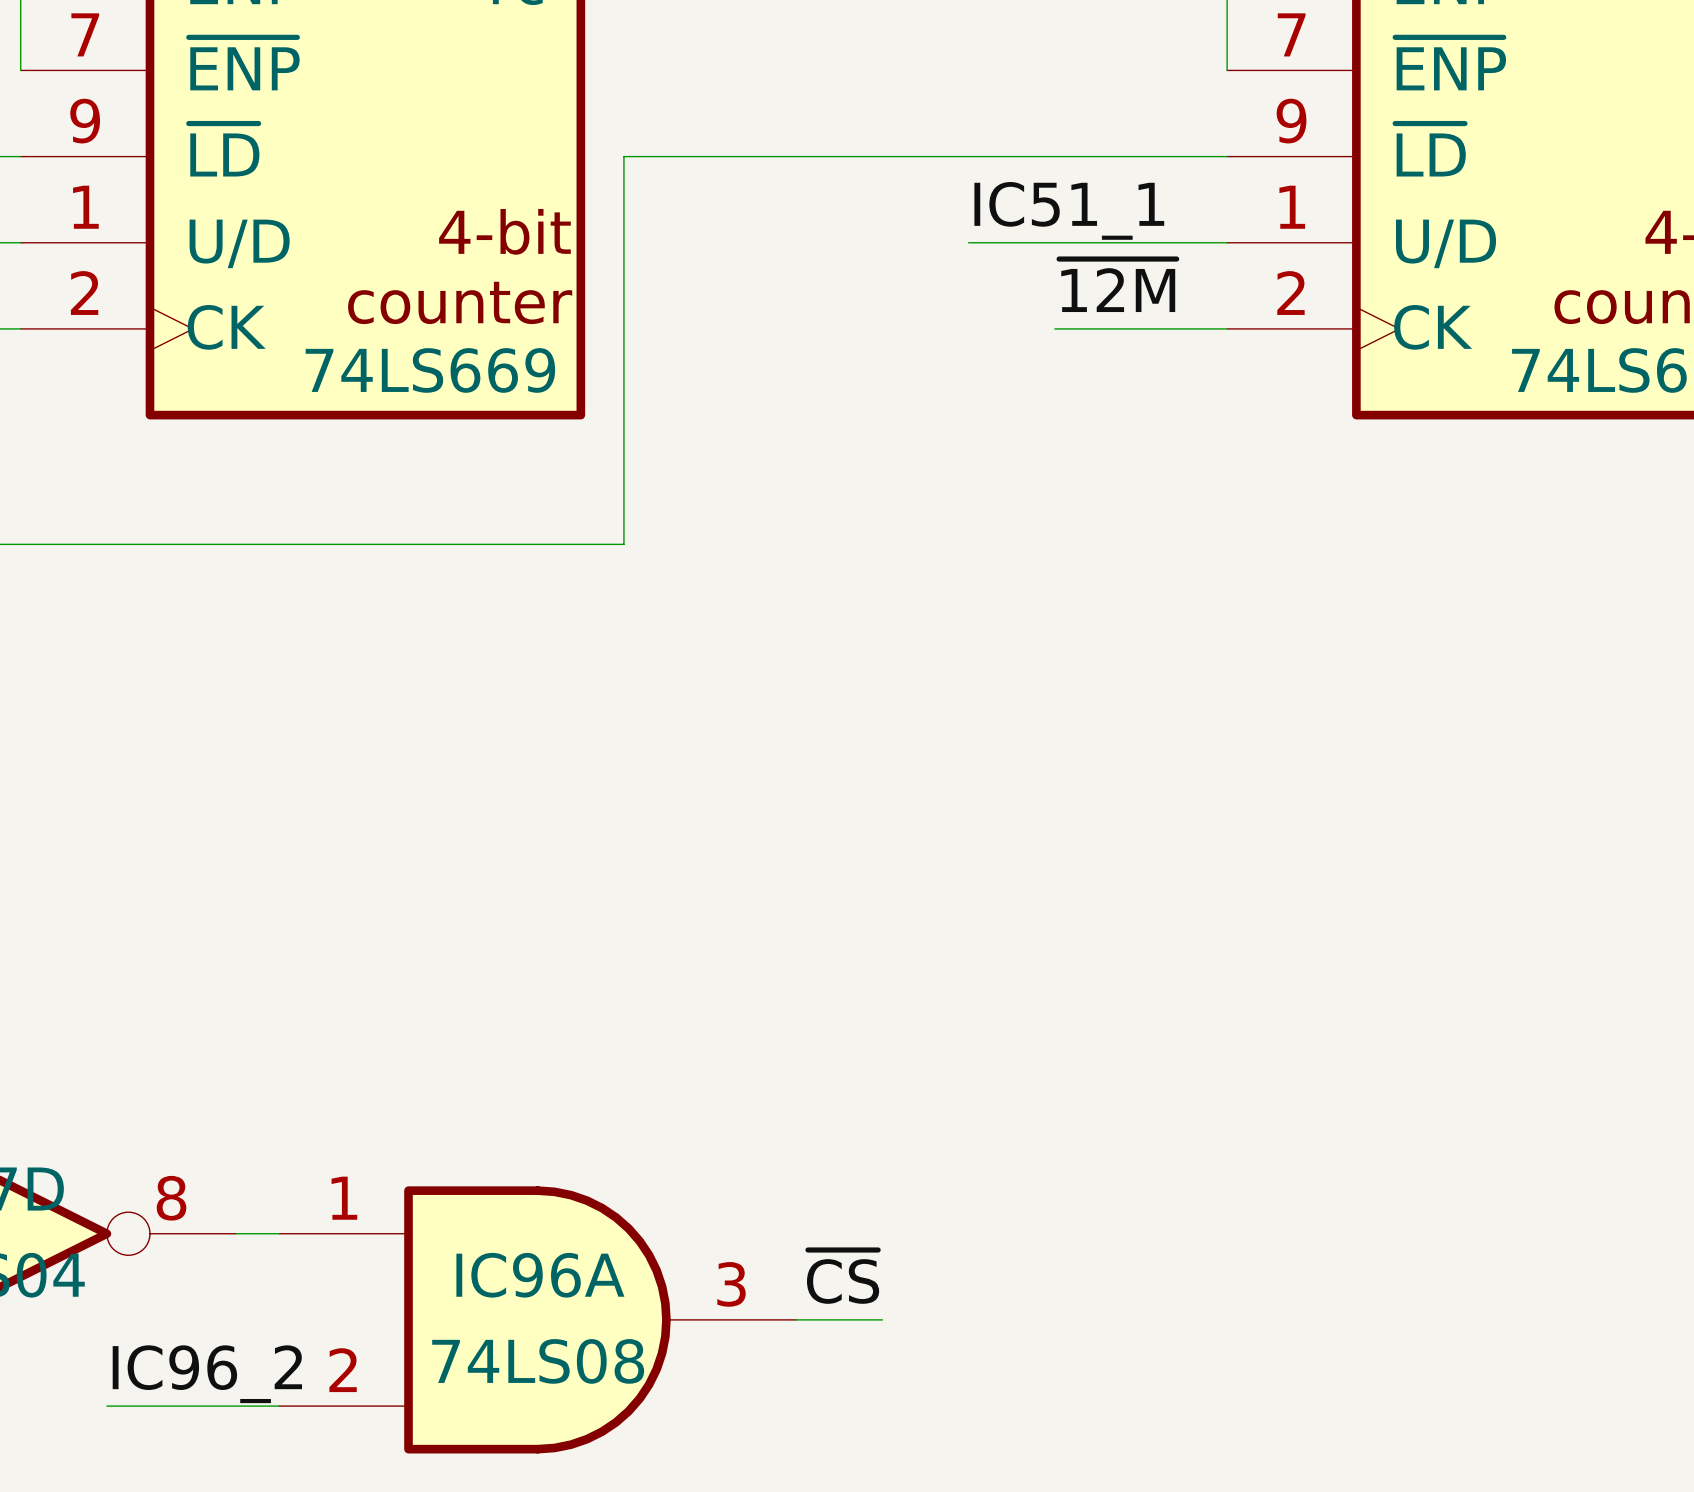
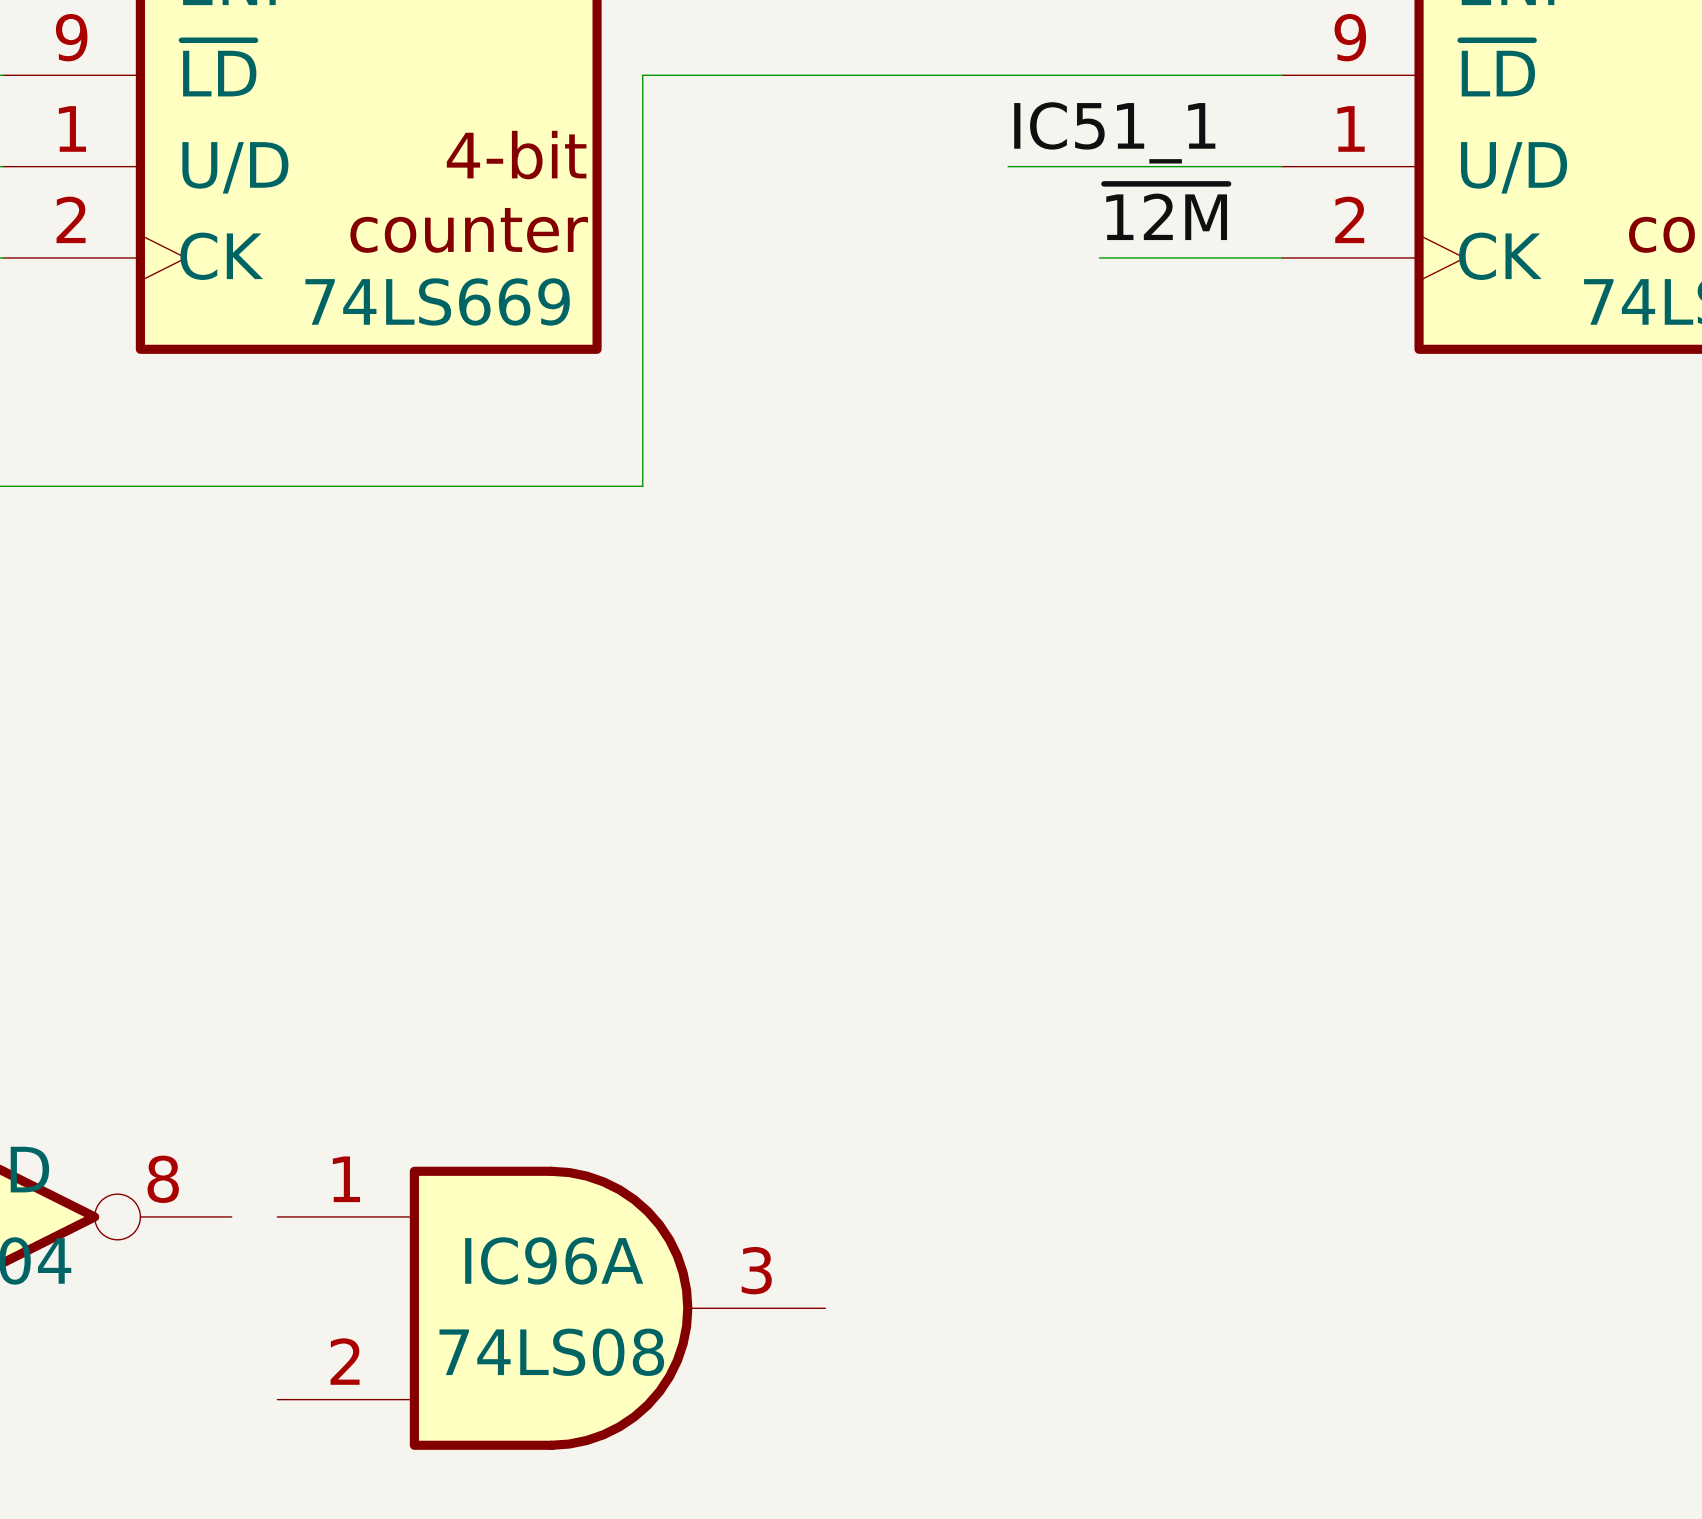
wire: (236, 1233) (279, 1233) -> none
label: ~{CS} (843, 1276) -> none
wire: (796, 1319) (882, 1319) -> none
label: IC96_2 (207, 1374) -> none
wire: (106, 1406) (279, 1406) -> none

